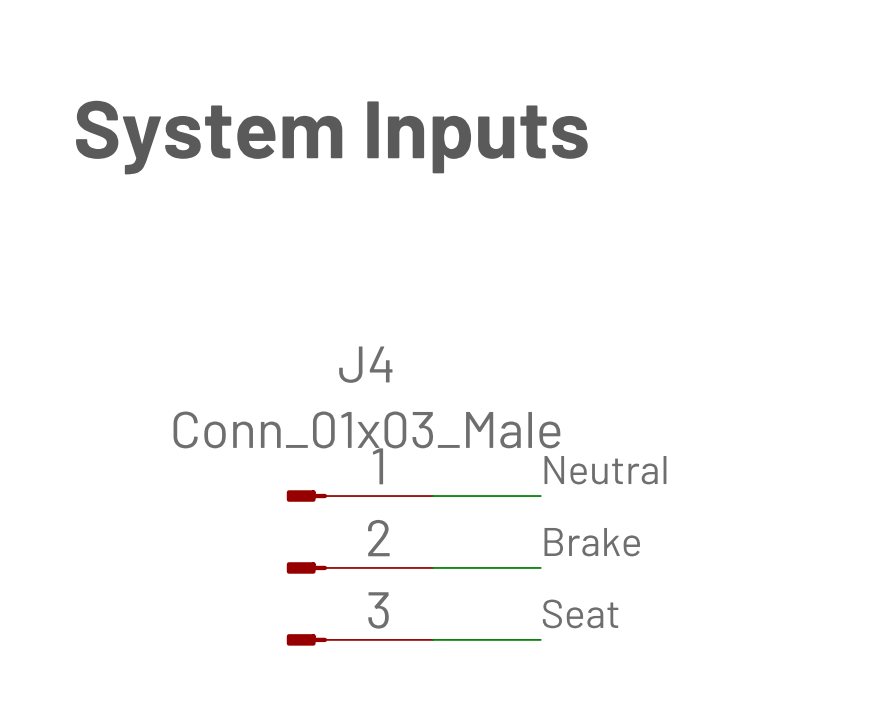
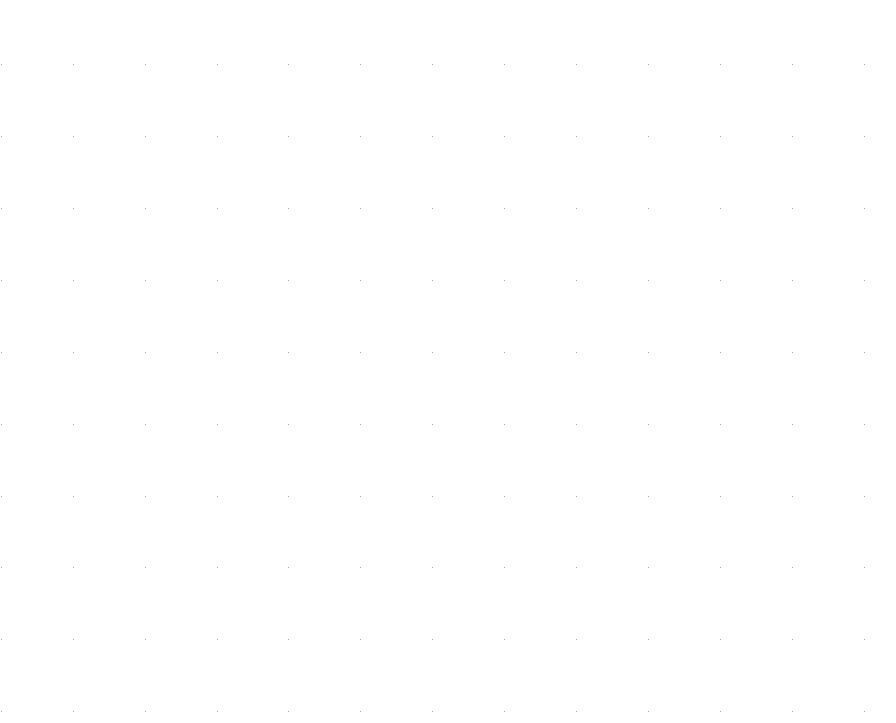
text: System Inputs (331, 137) -> none
label: Neutral (605, 470) -> none
wire: (432, 496) (540, 496) -> none
label: Brake (592, 542) -> none
J4: Conn_01x03_Male (359, 567) -> none
wire: (432, 567) (540, 567) -> none
label: Seat (580, 613) -> none
wire: (432, 639) (540, 639) -> none

